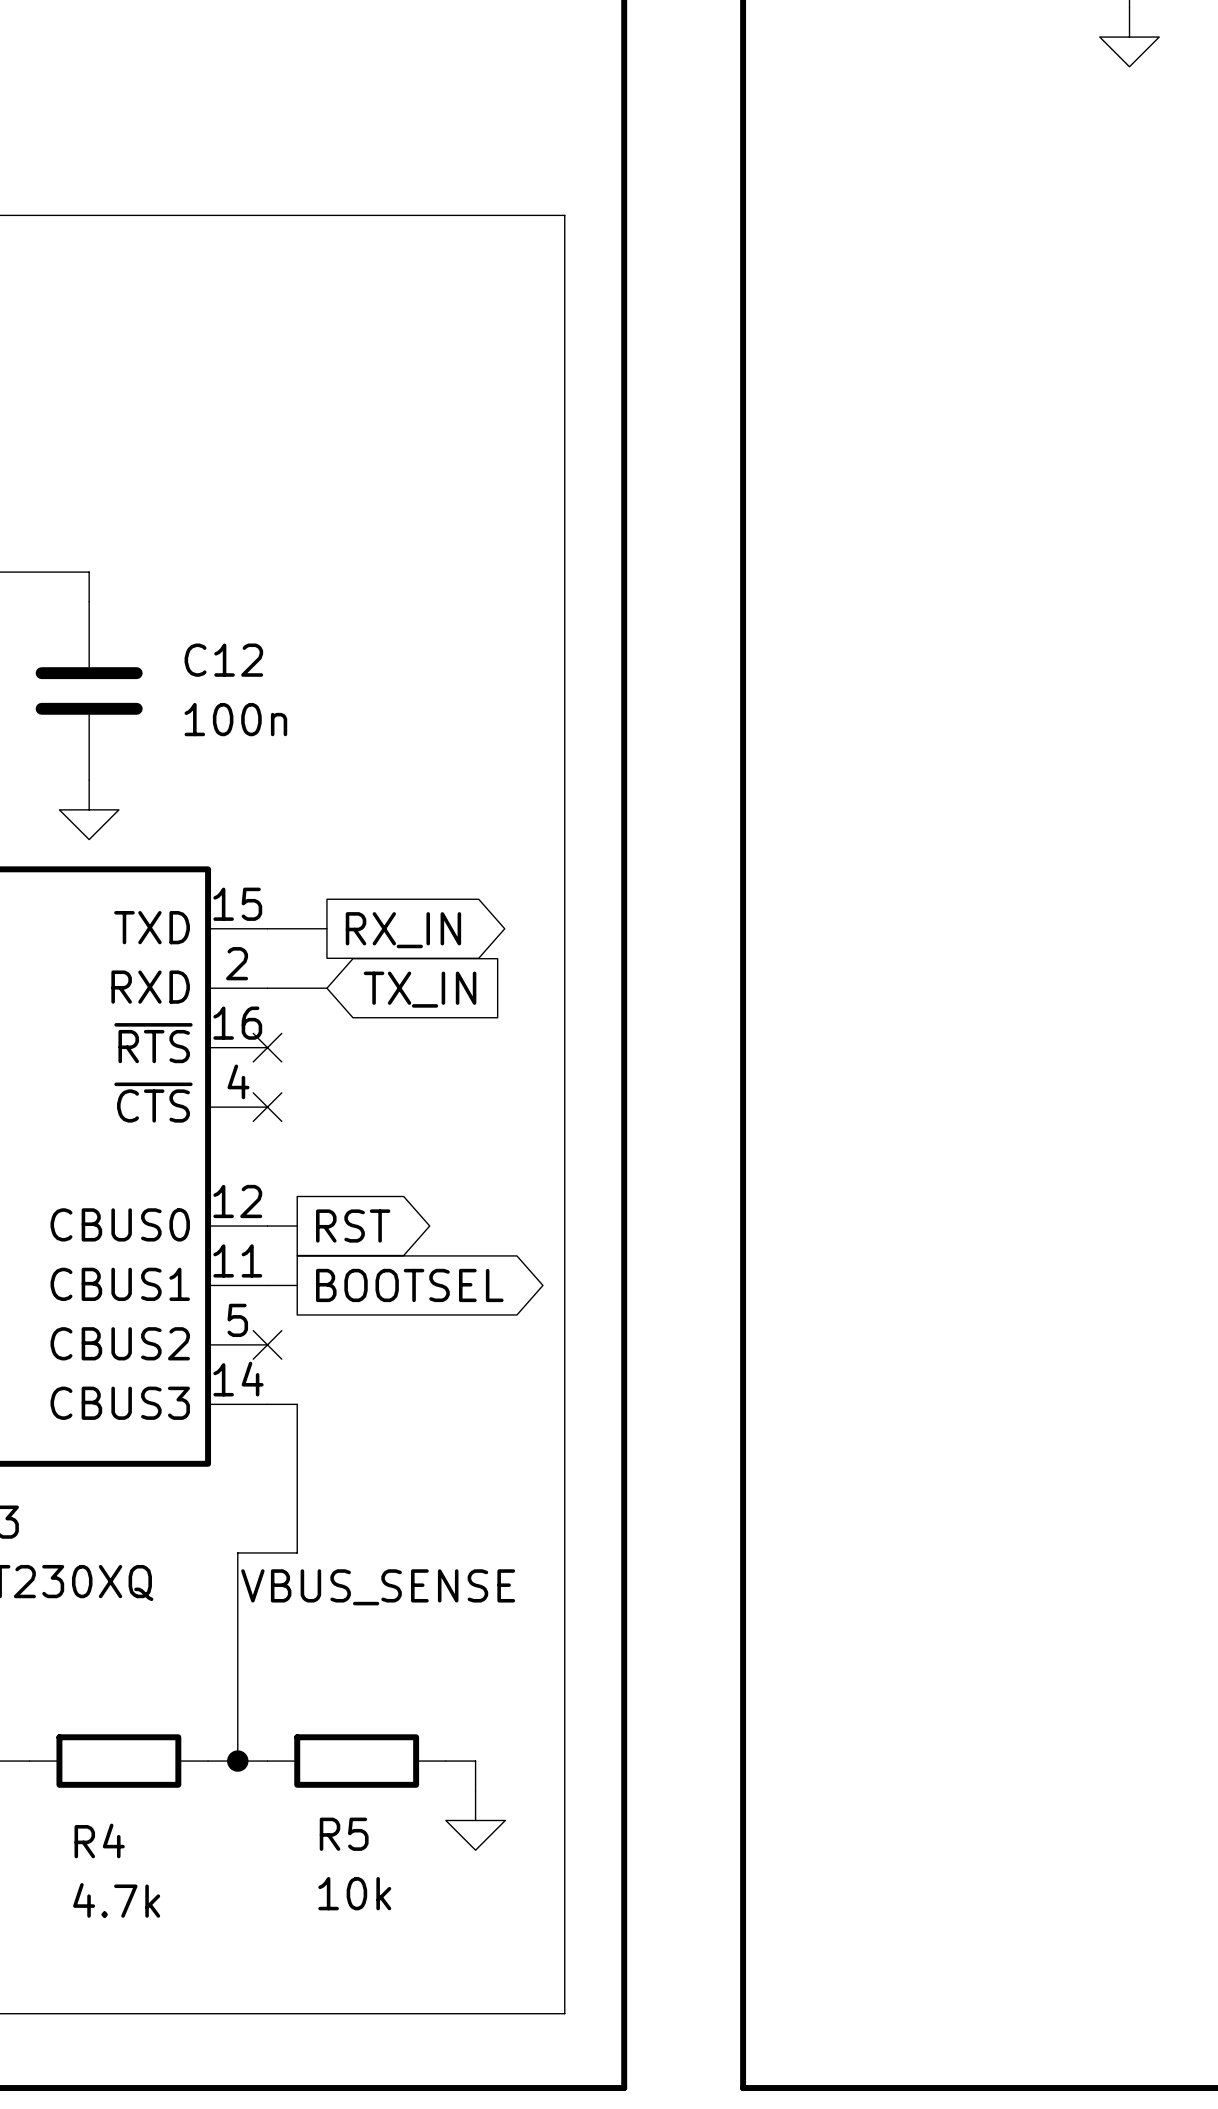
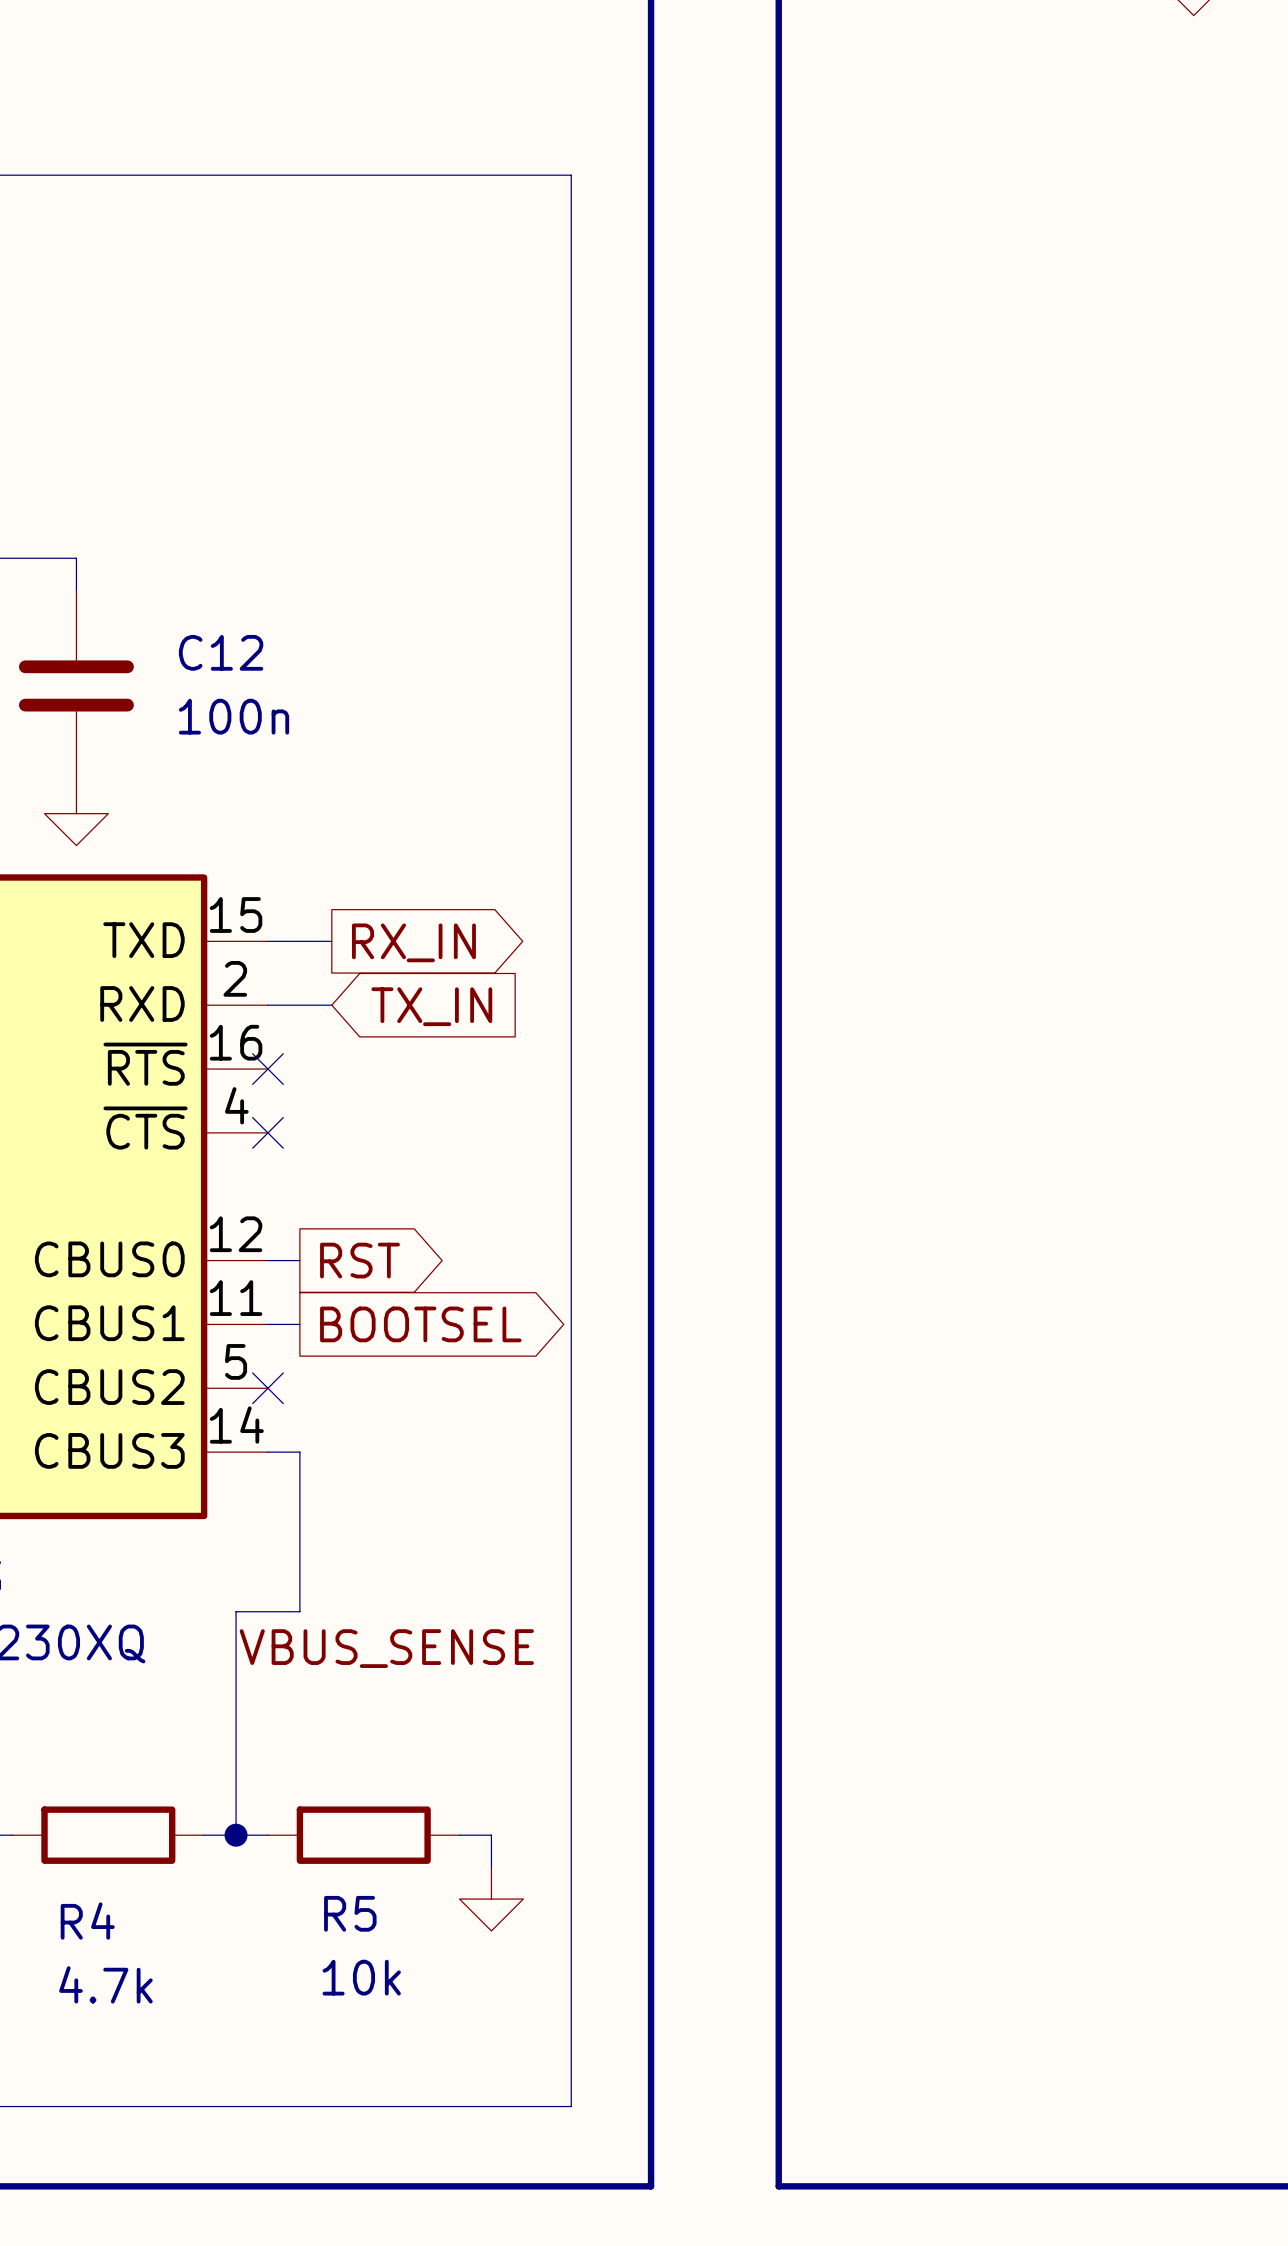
line: (549, 215) (564, 215) (564, 2013) (549, 2013) -> (571, 175) (571, 2106)

